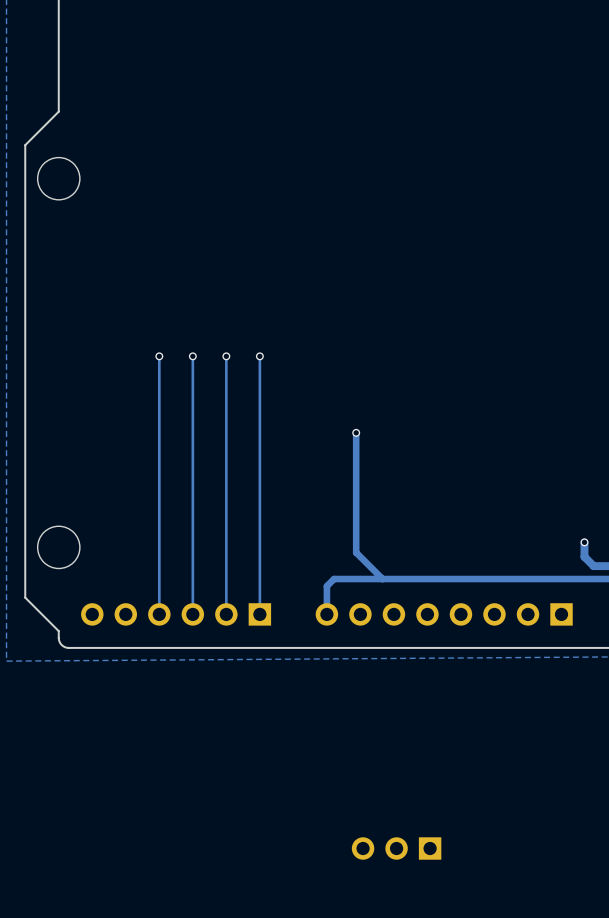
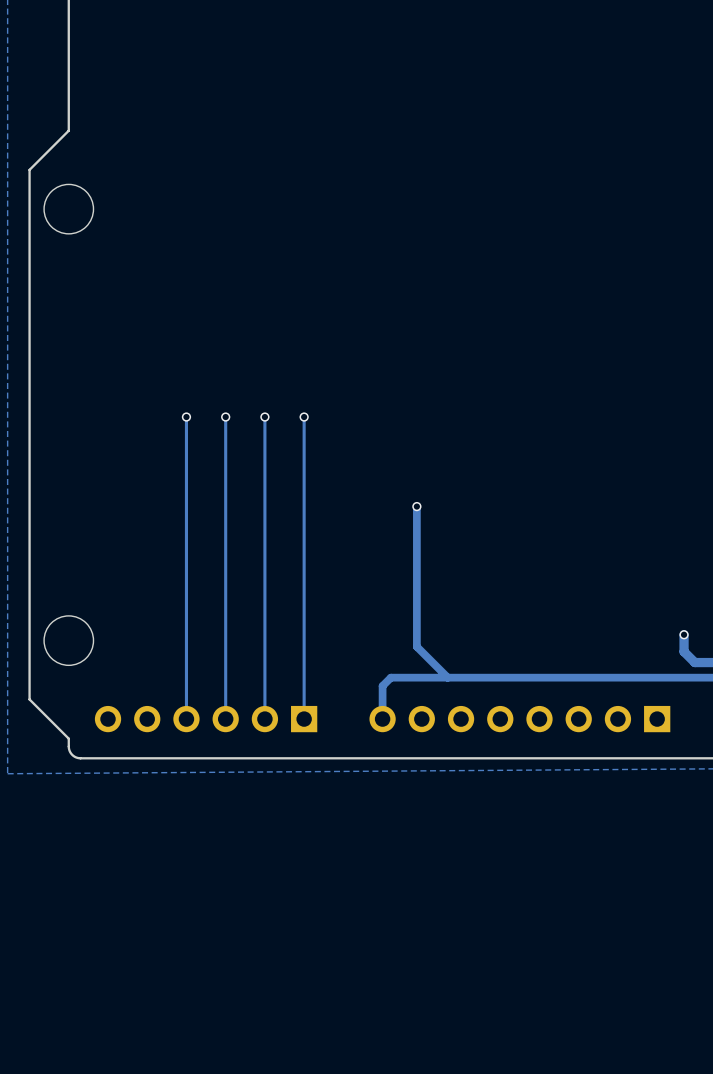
part: (396, 848) -> none

